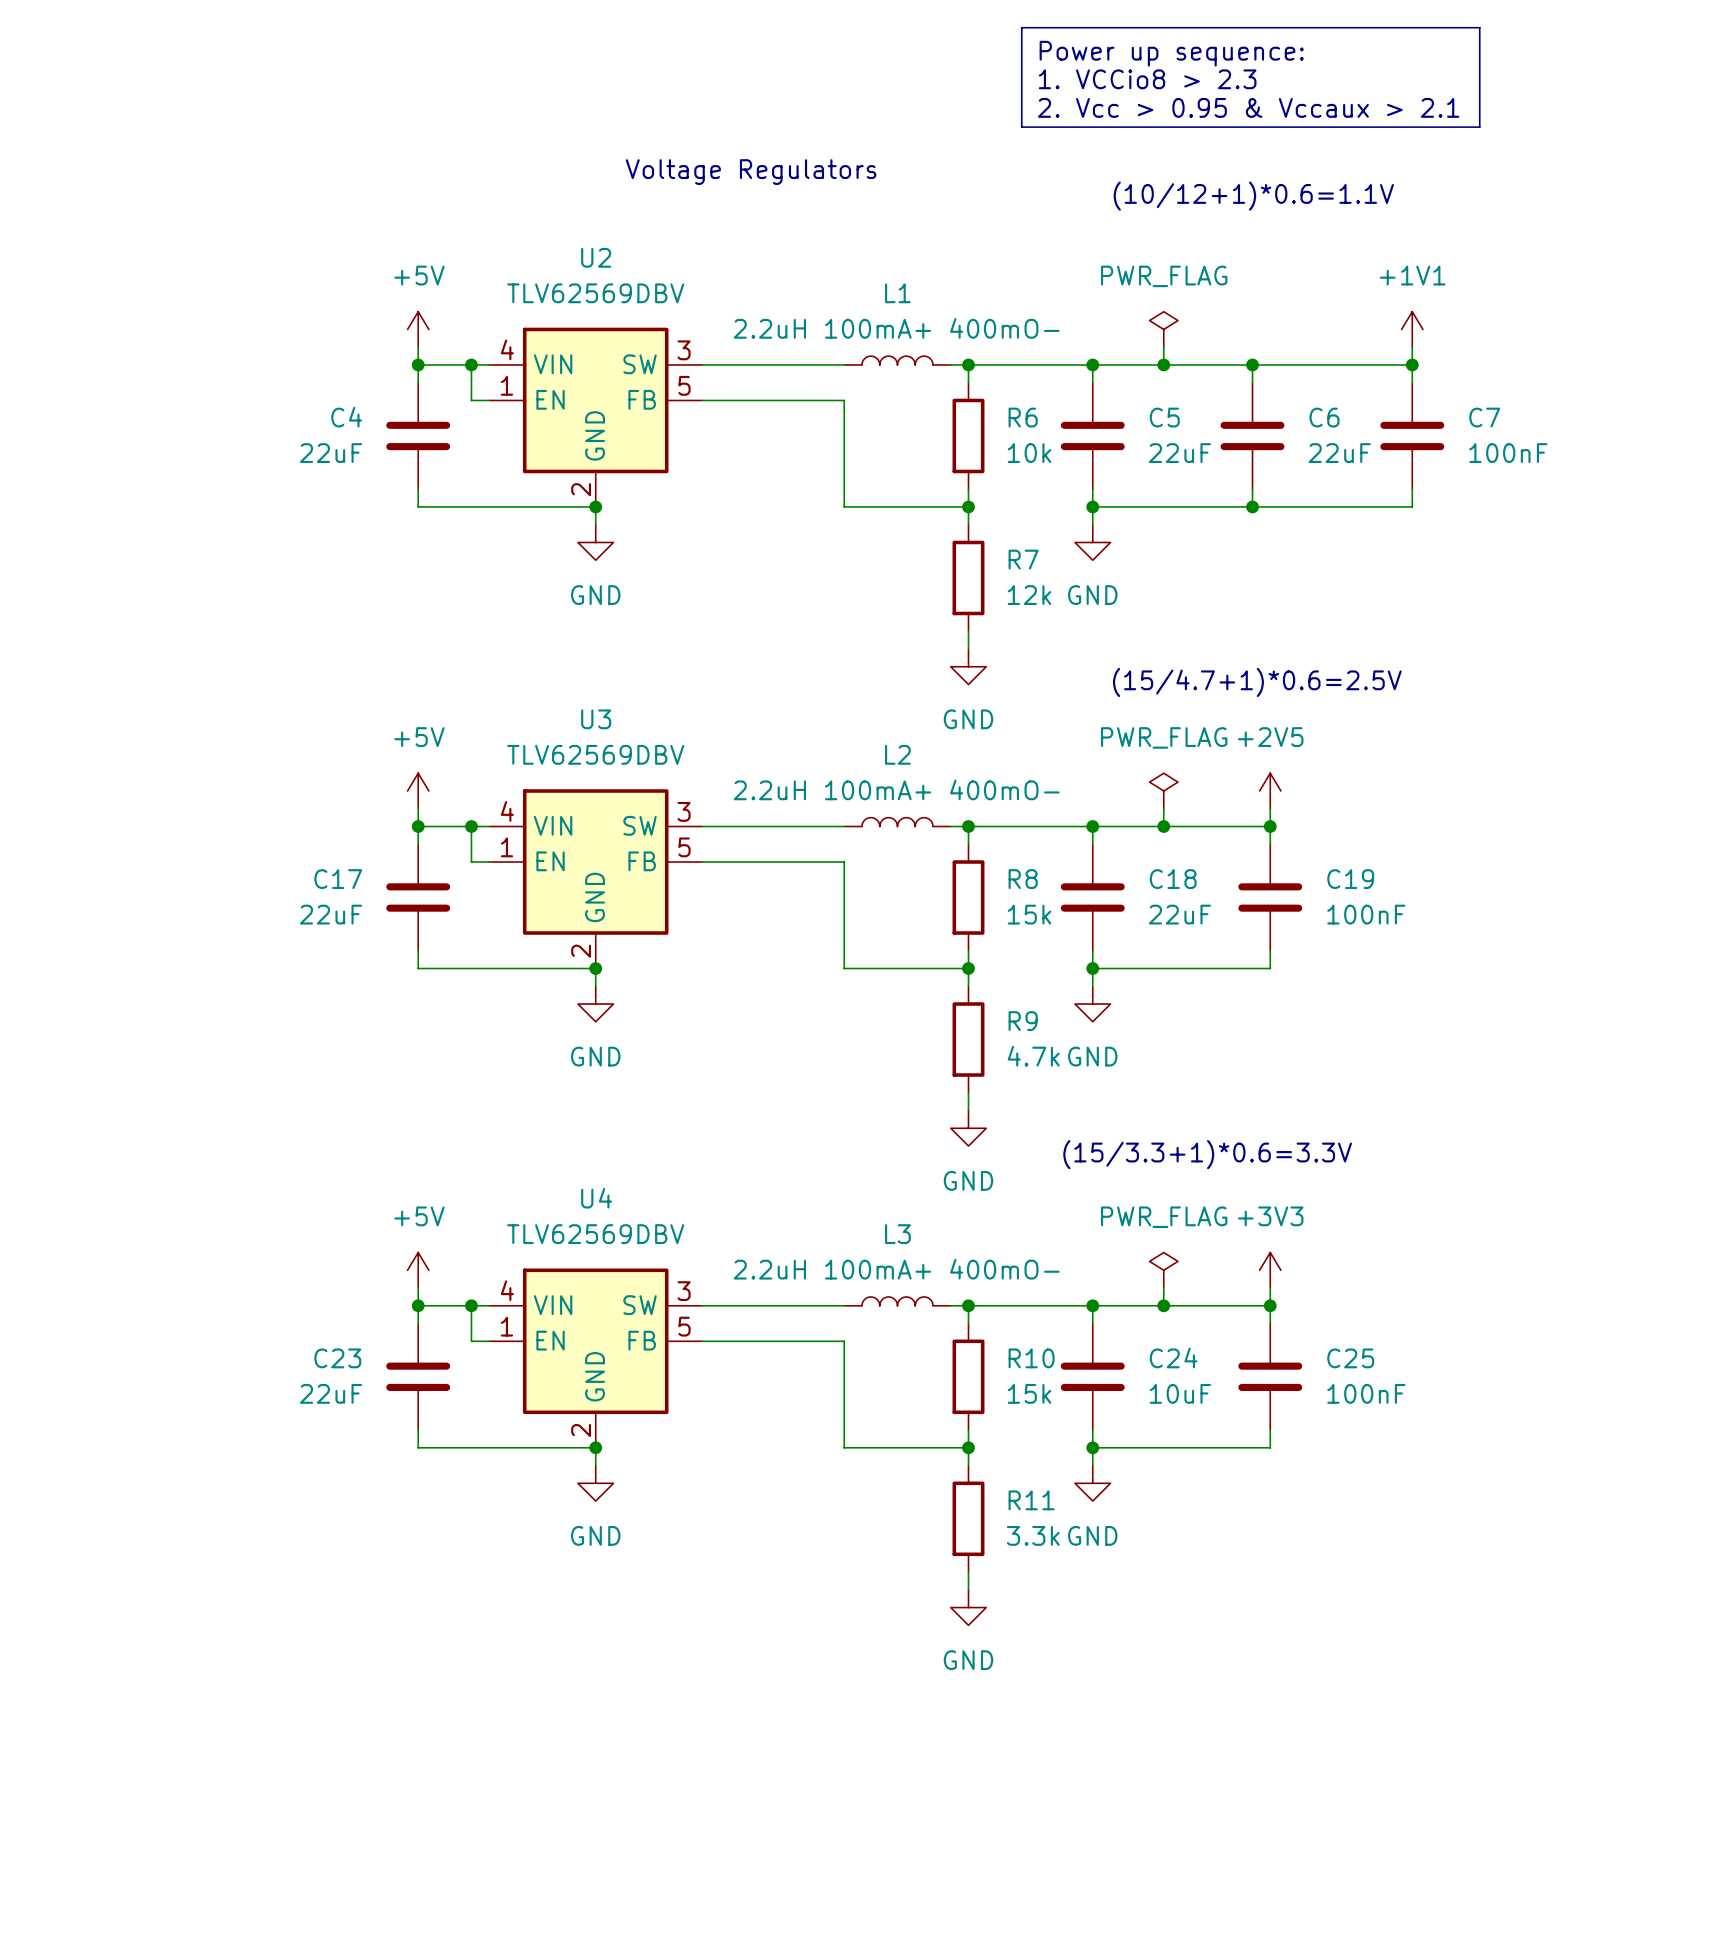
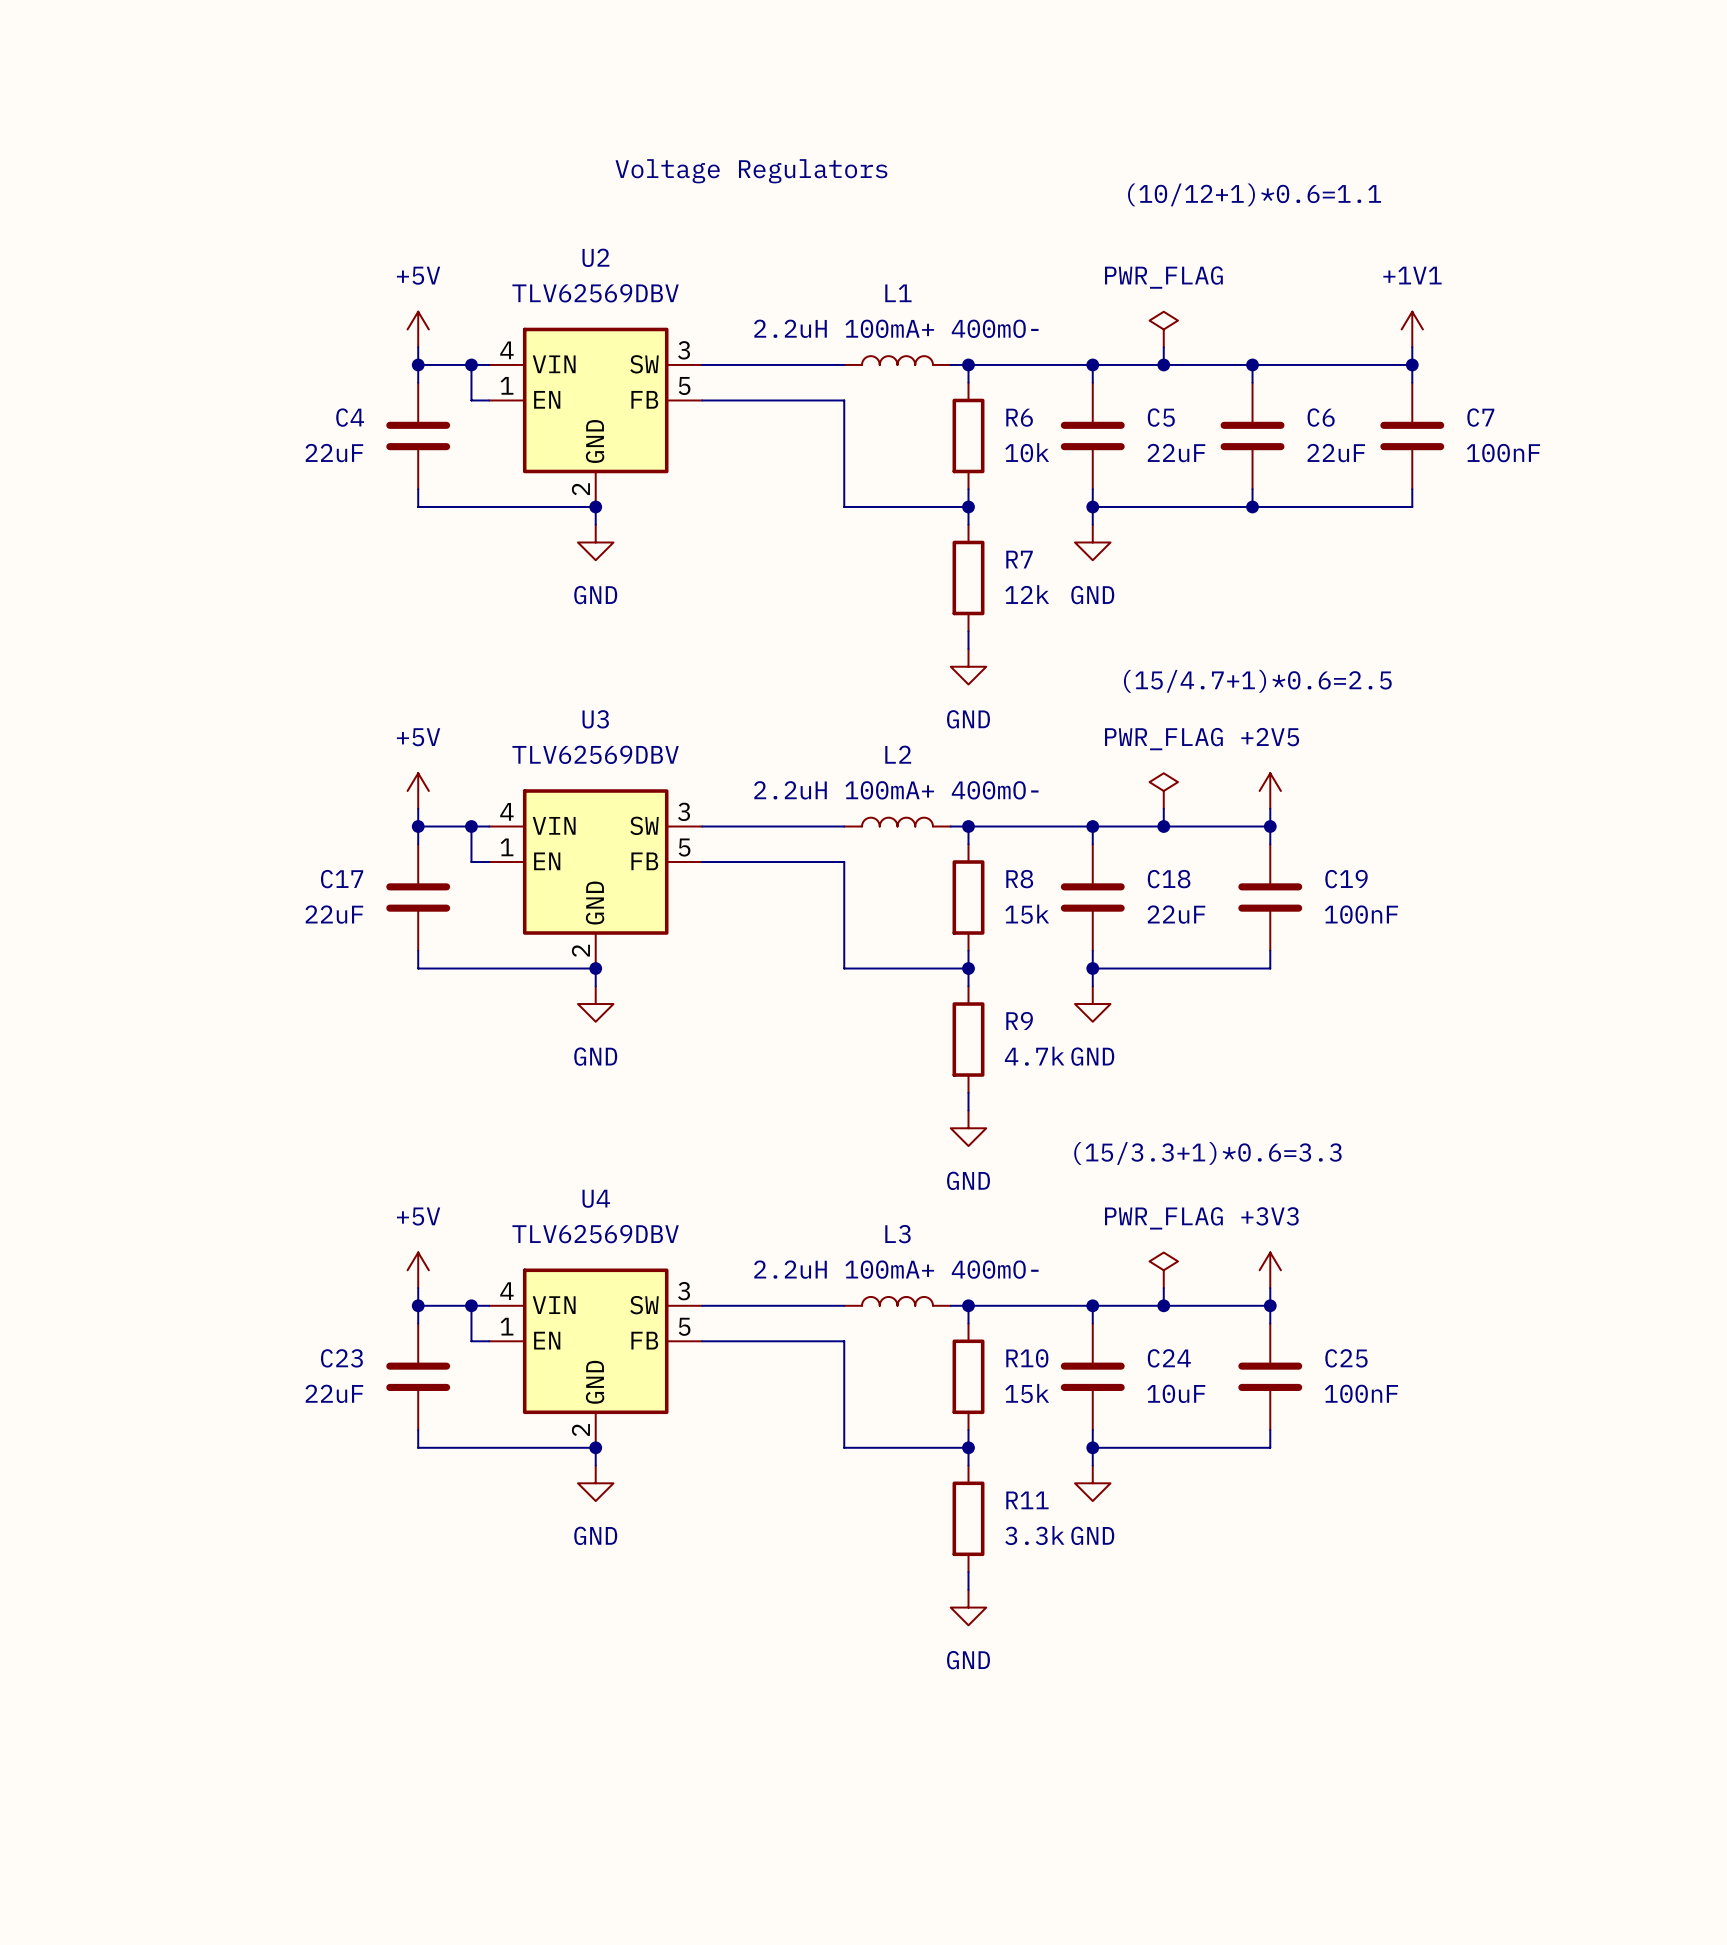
line: (1021, 27) (1479, 27) (1479, 127) (1021, 127) (1021, 27) -> none
text: Power up sequence: (1171, 53) -> none
text: 1. VCCio8 > 2.3 (1147, 79) -> none
text: 2. Vcc > 0.95 & Vccaux > 2.1 (1248, 107) -> none
text: (10/12+1)*0.6=1.1V (1253, 196) -> (10/12+1)*0.6=1.1 (1254, 194)
text: (15/4.7+1)*0.6=2.5V (1257, 682) -> (15/4.7+1)*0.6=2.5 (1257, 681)
text: (15/3.3+1)*0.6=3.3V (1207, 1154) -> (15/3.3+1)*0.6=3.3 (1207, 1153)

